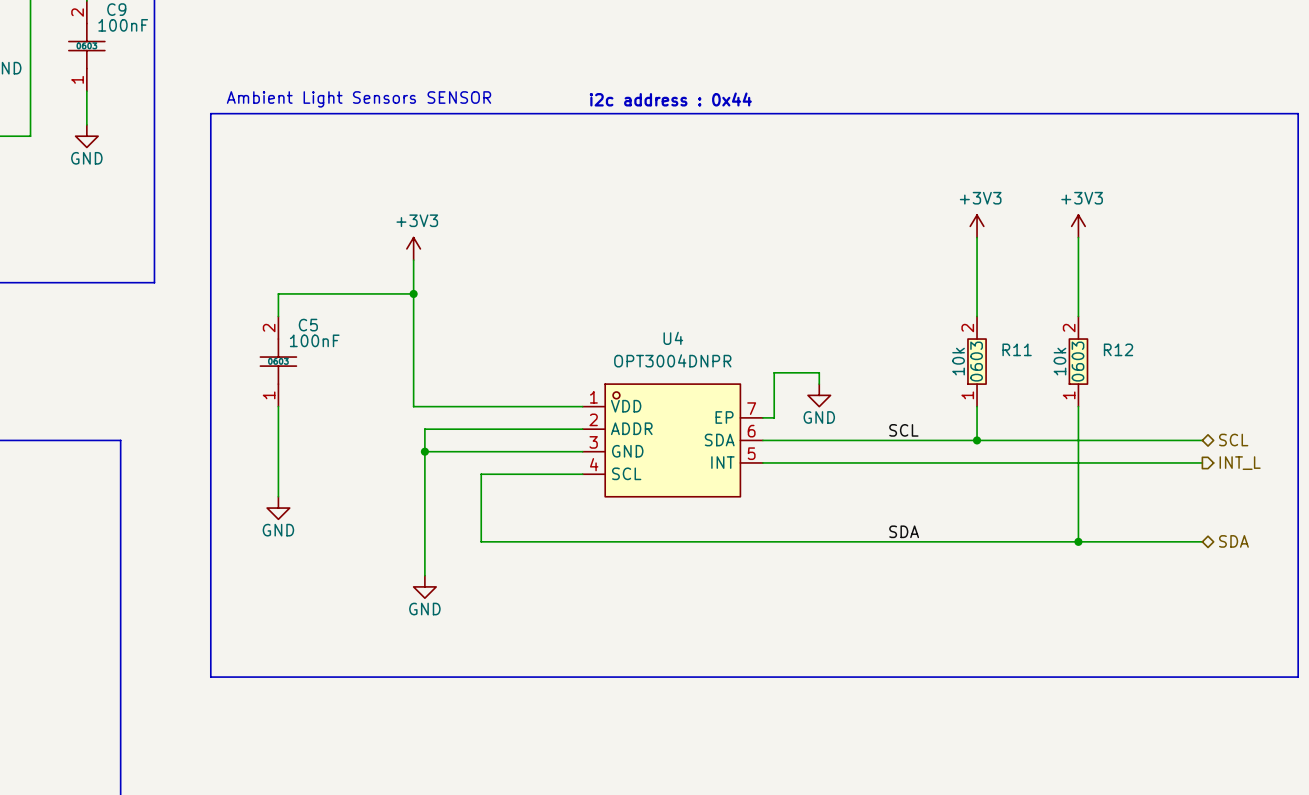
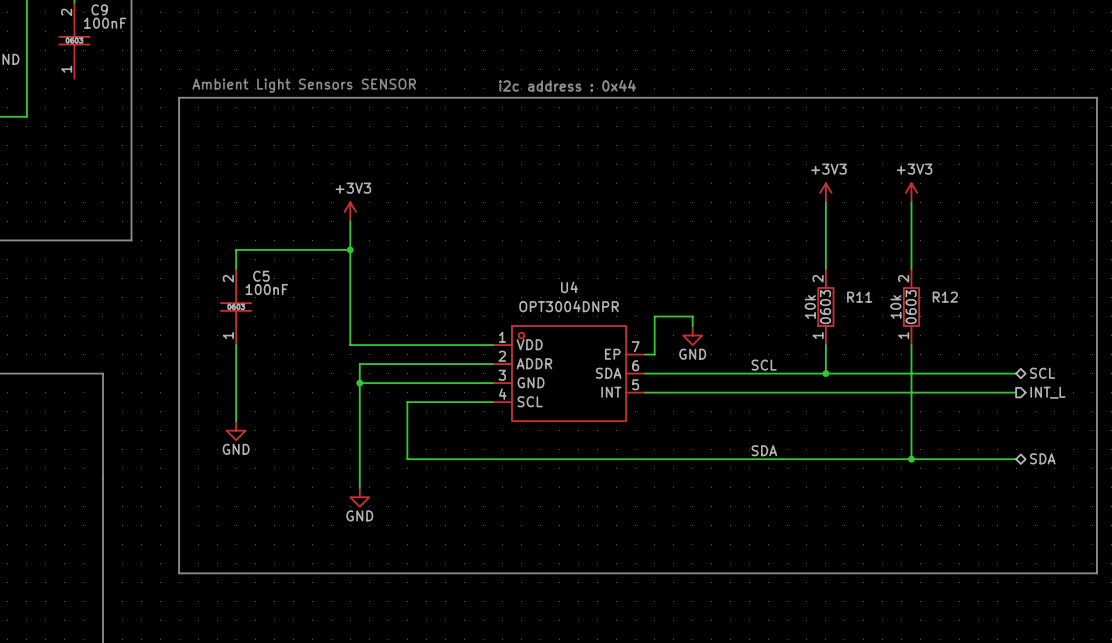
wire: (86, 91) (86, 124) -> none
power symbol: GND (86, 136) -> none

